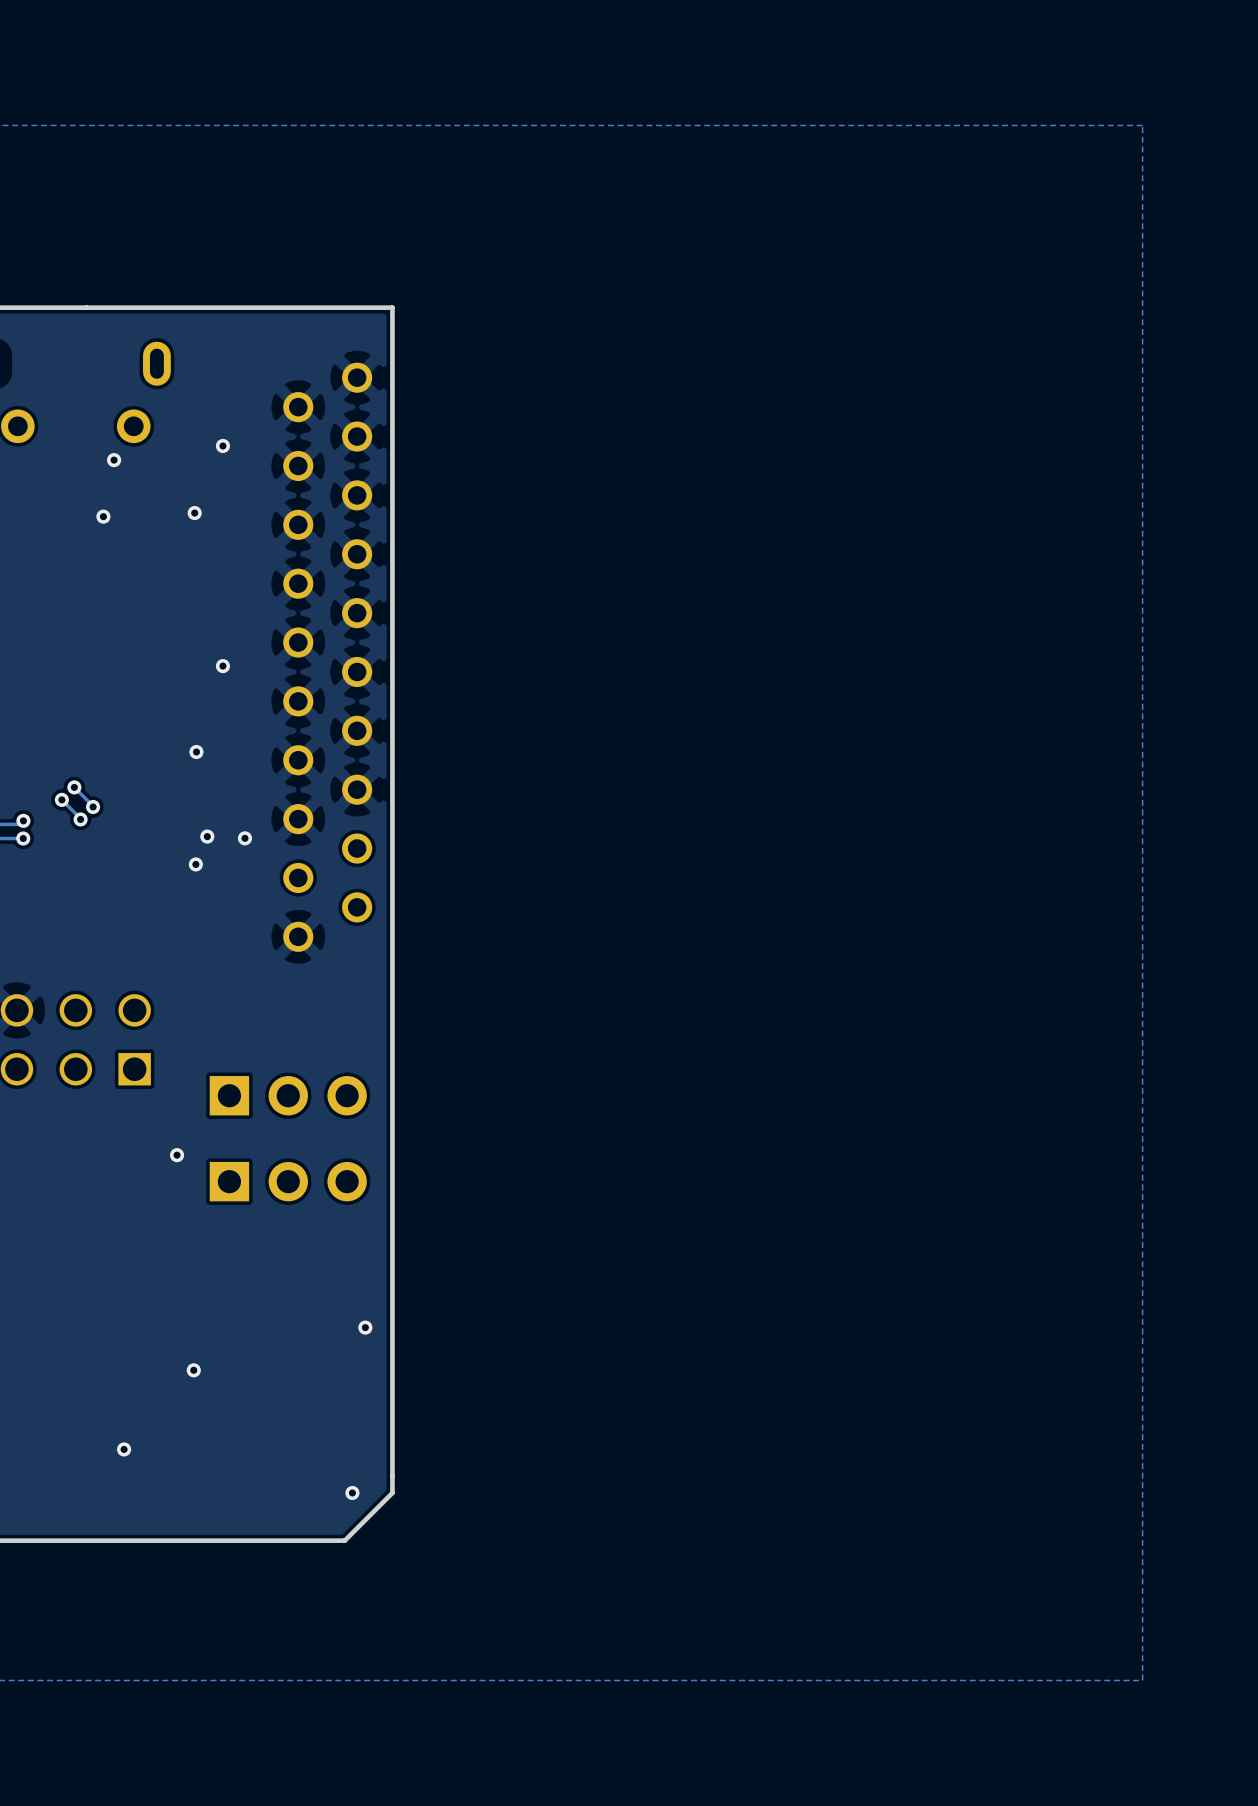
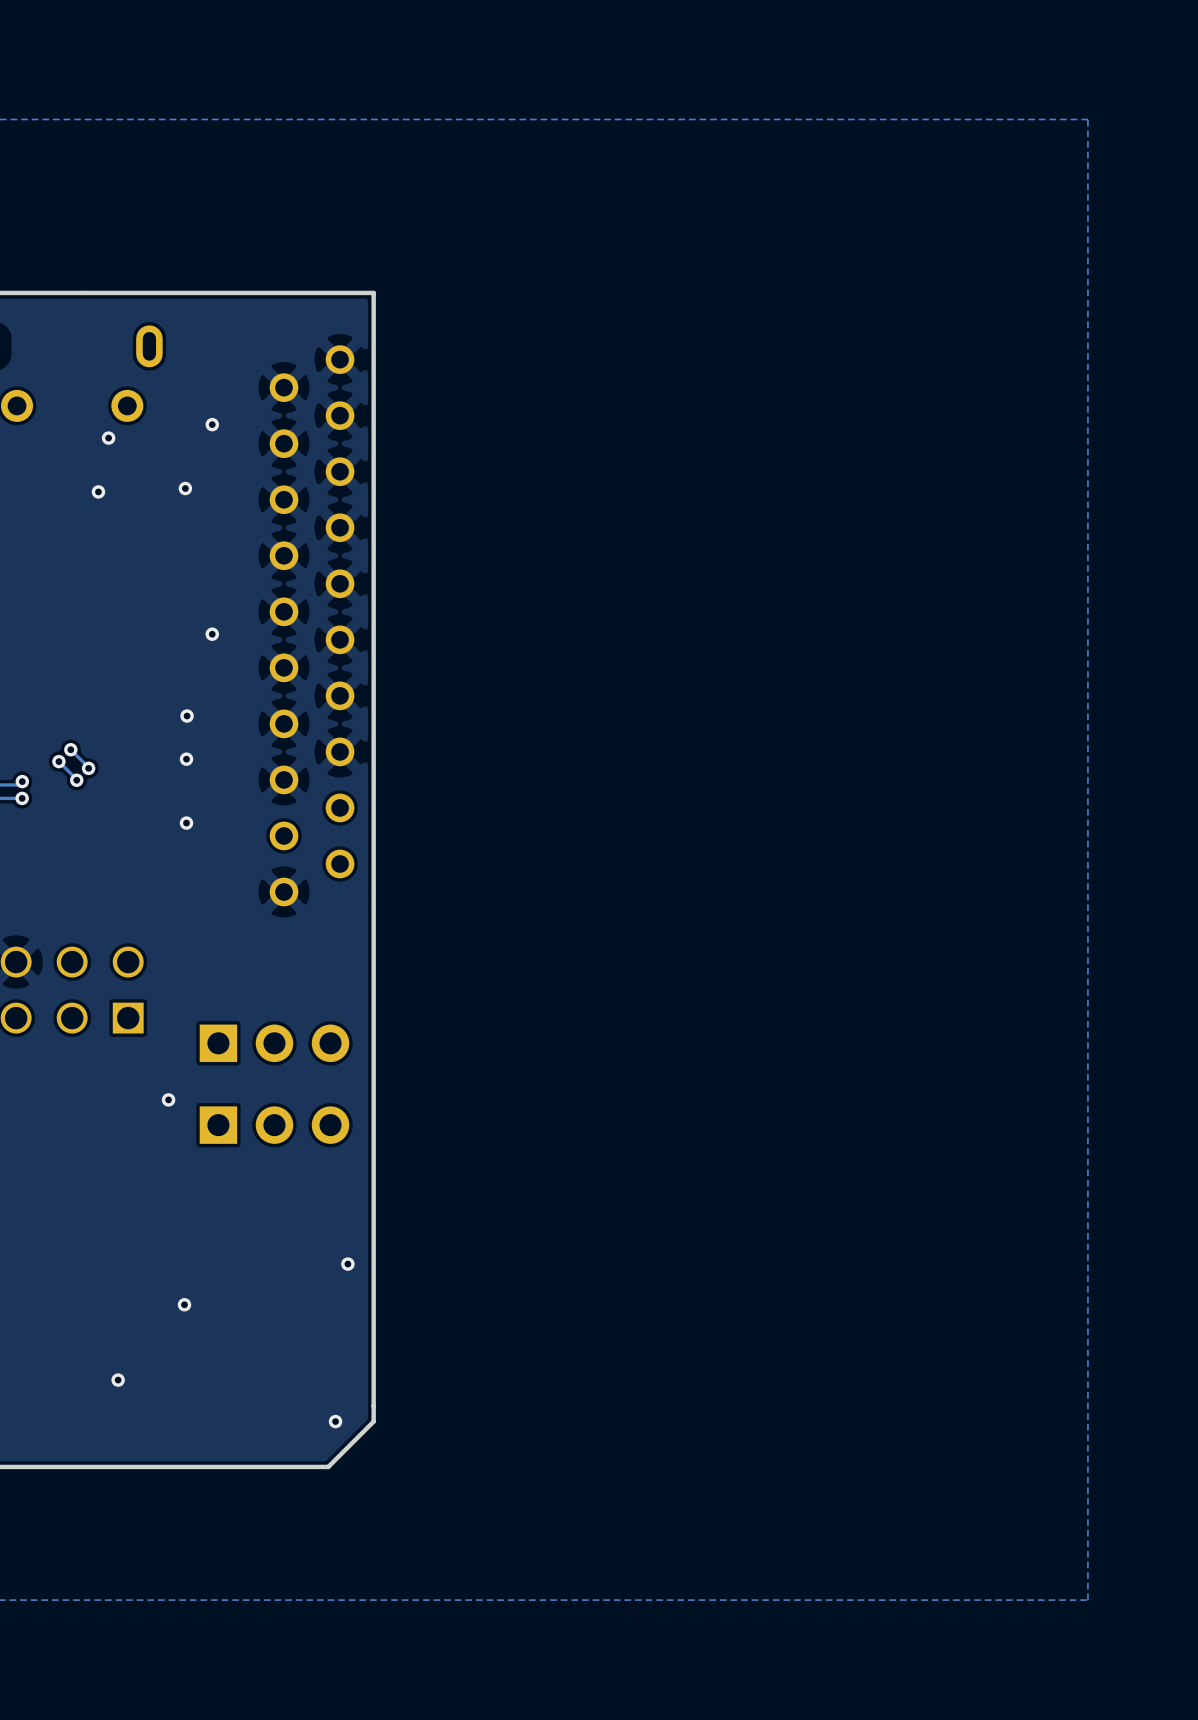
via: none -> (186, 759)
via: (207, 836) -> none
via: (244, 838) -> none

